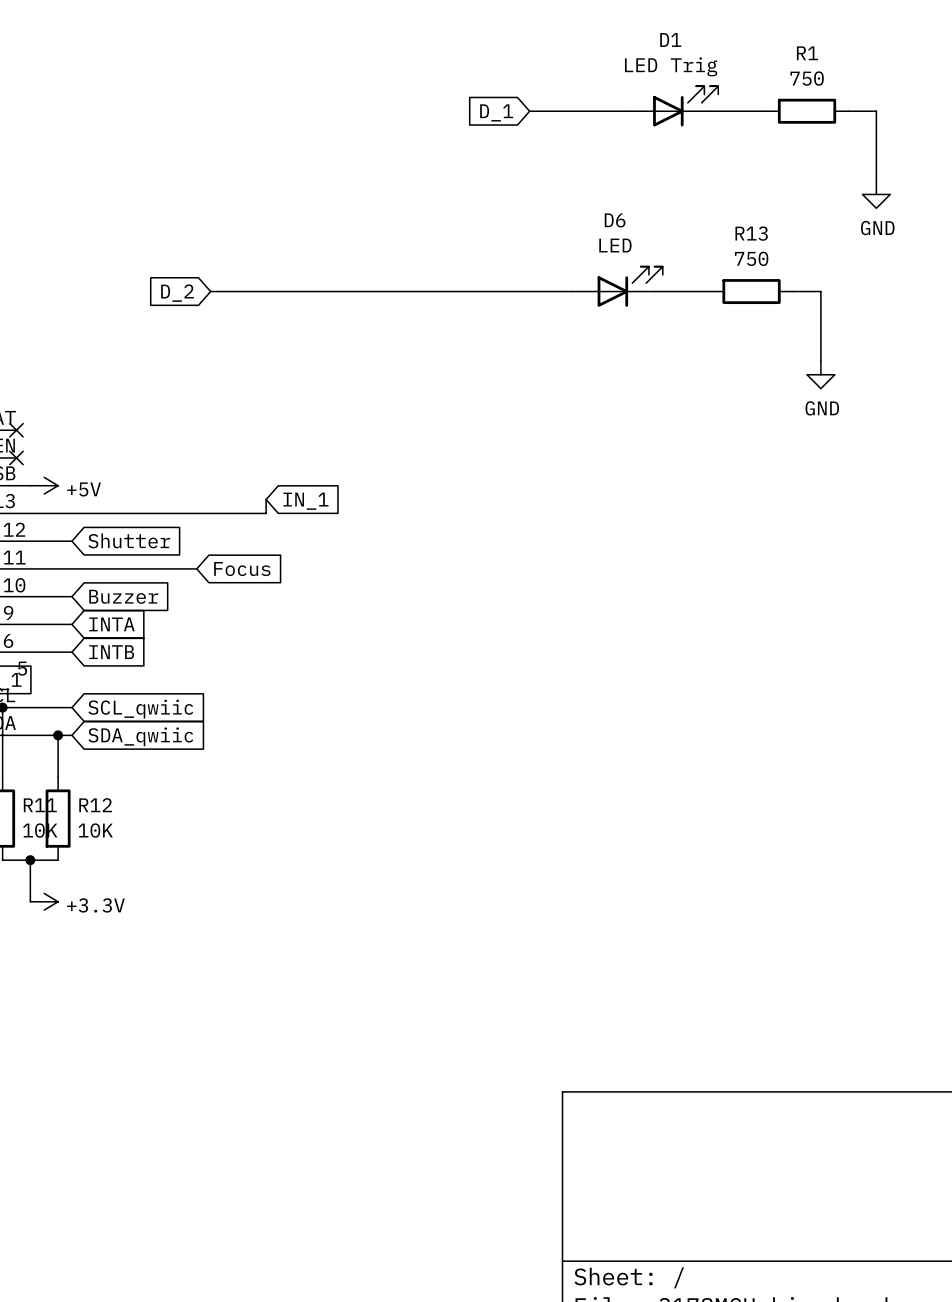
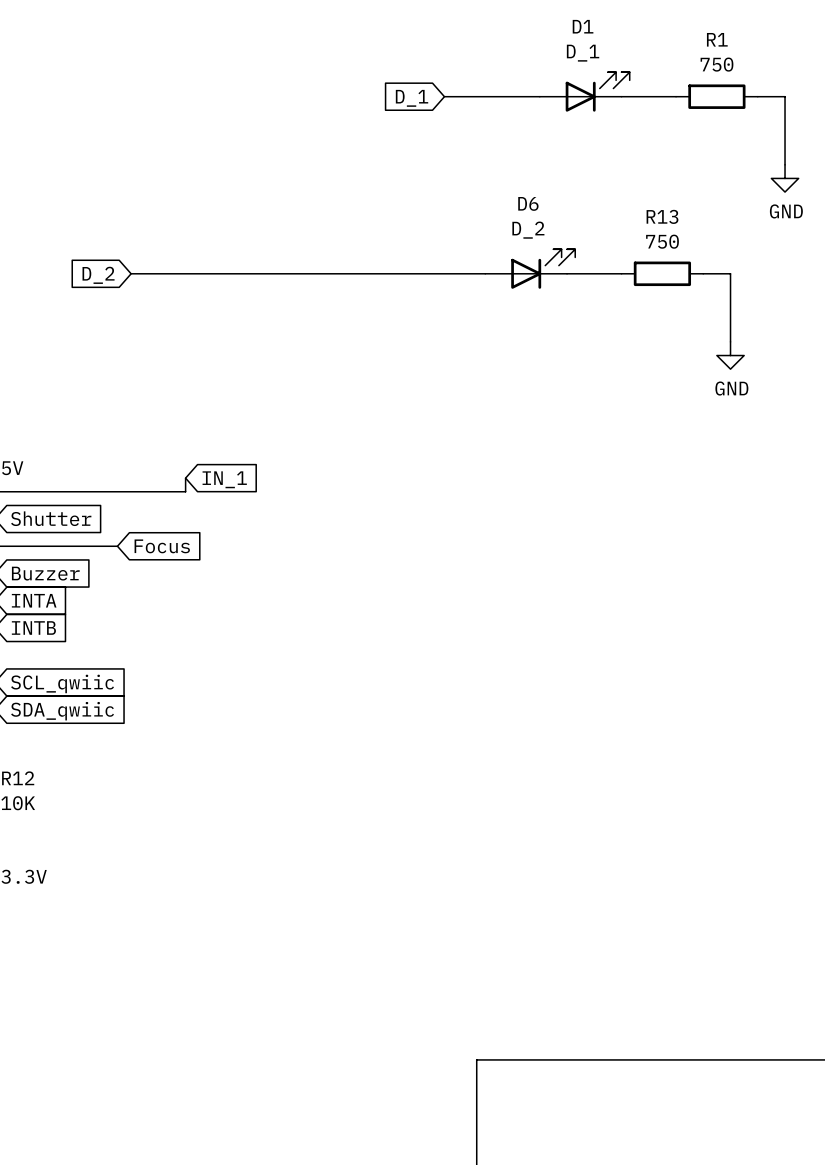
D1 value: LED Trig (671, 66) -> D_1 (583, 53)
D6 value: LED (615, 245) -> D_2 (528, 230)

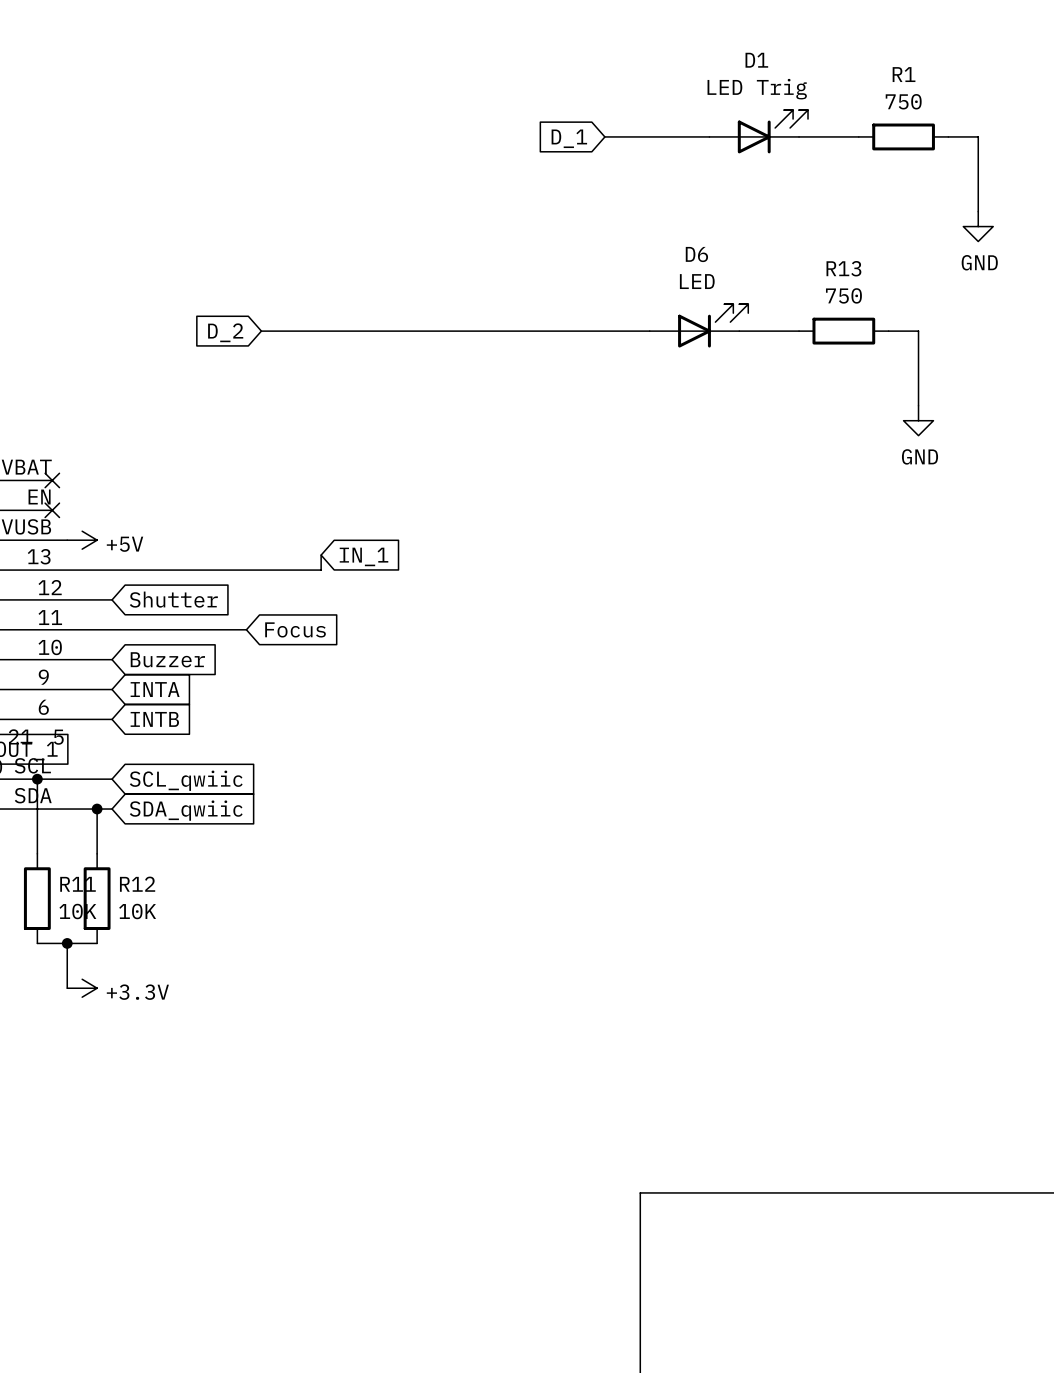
D1 value: D_1 (583, 53) -> LED Trig (757, 89)
D6 value: D_2 (528, 230) -> LED (697, 281)

